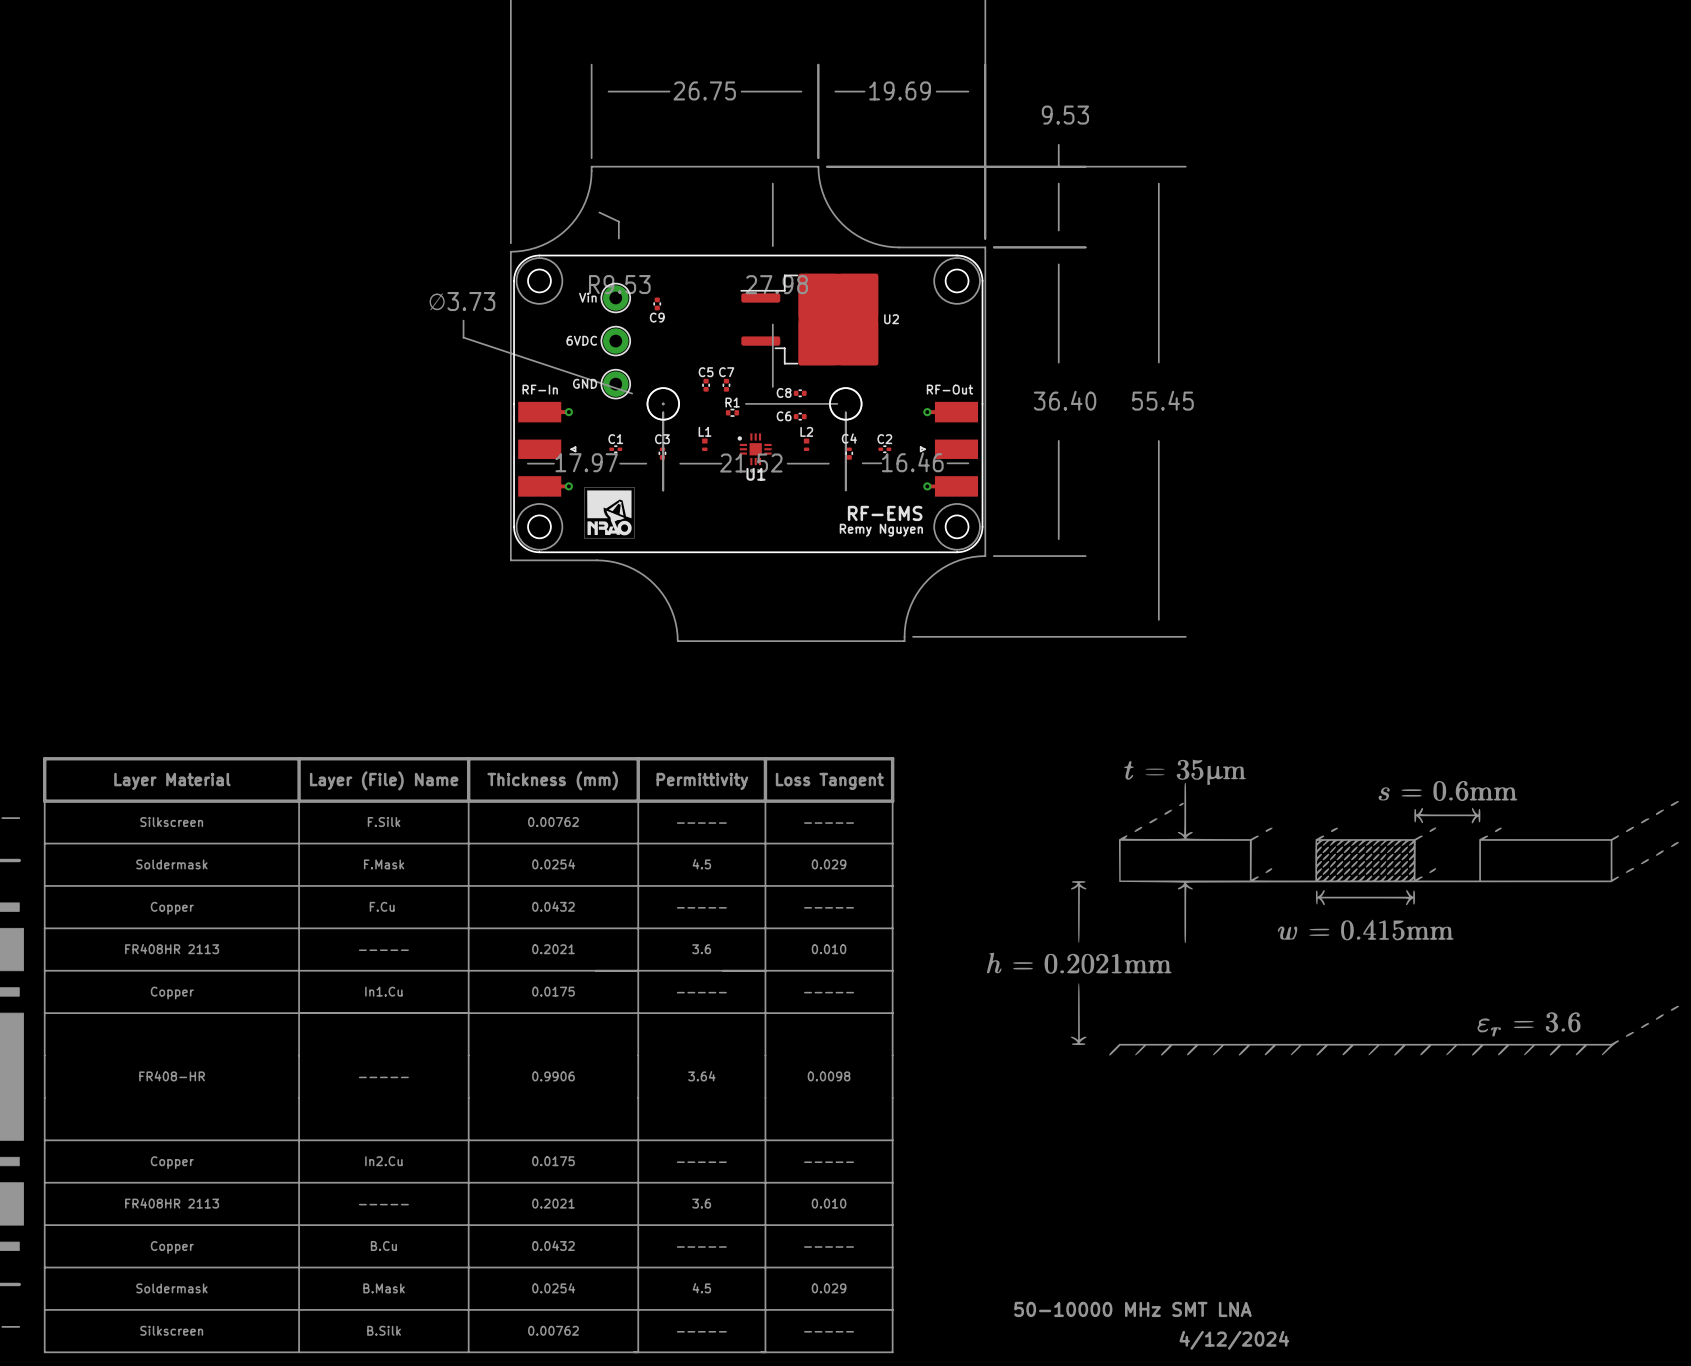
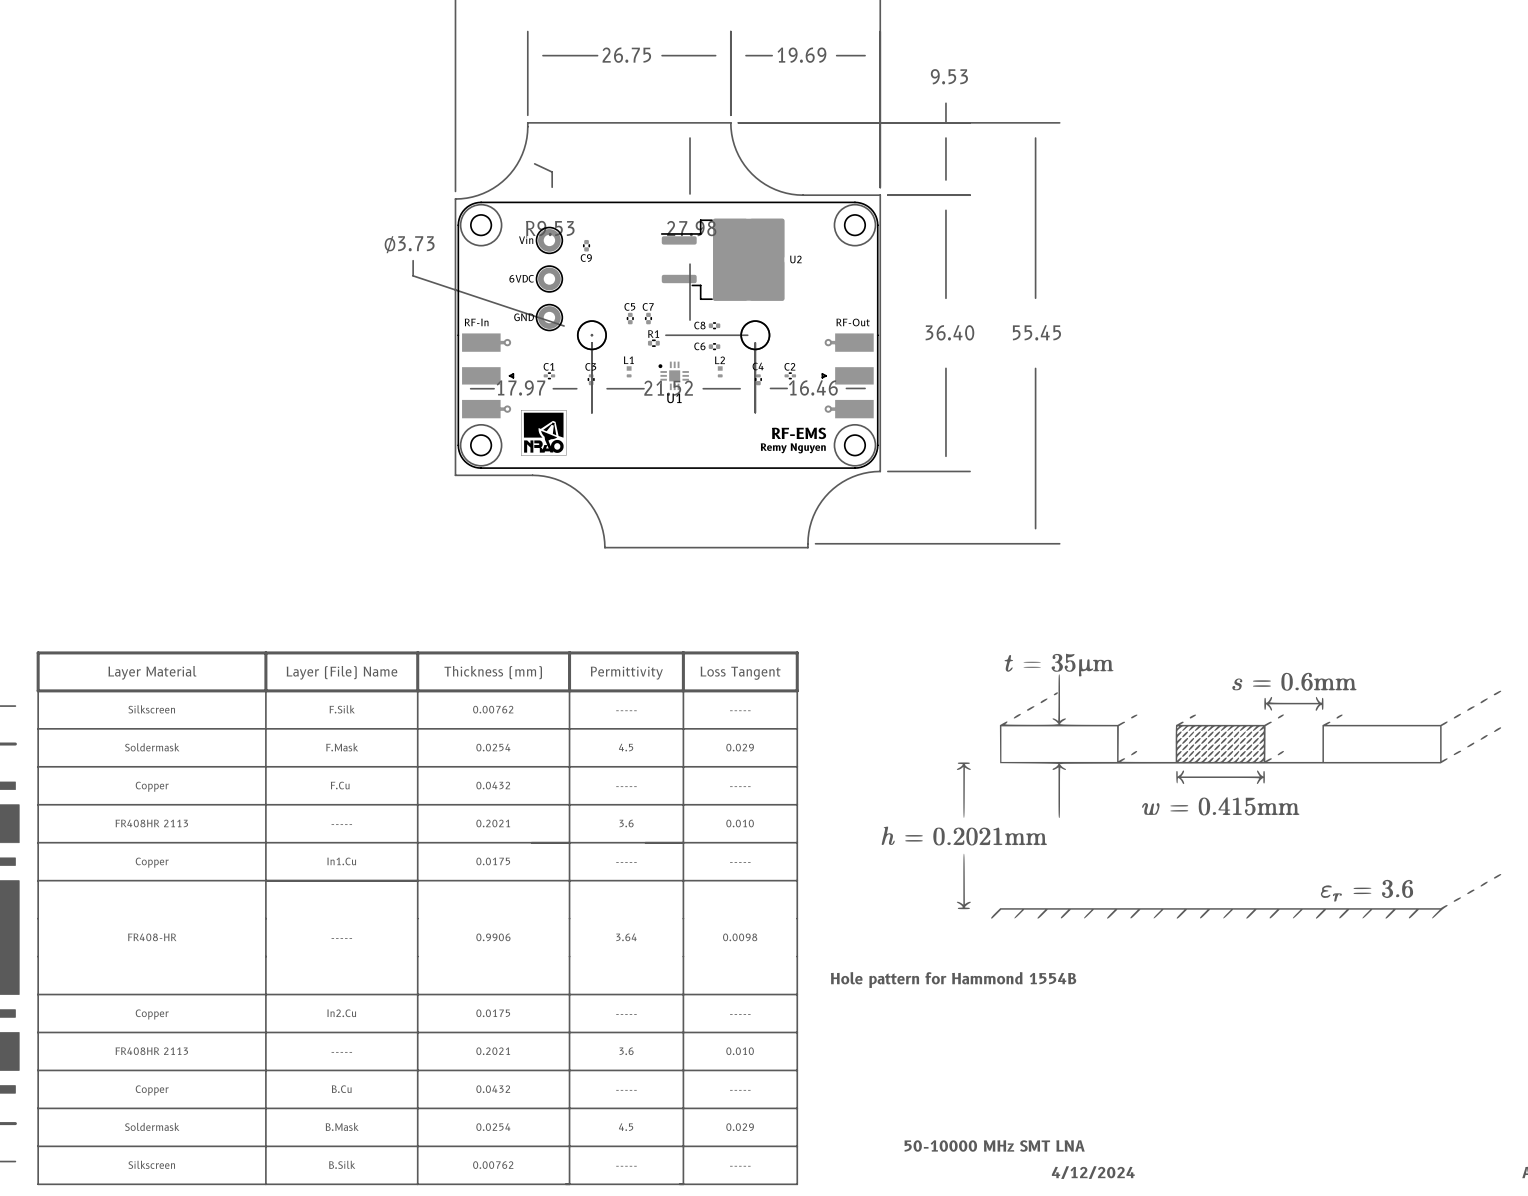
text: none -> Hole pattern for Hammond 1554B (953, 980)

